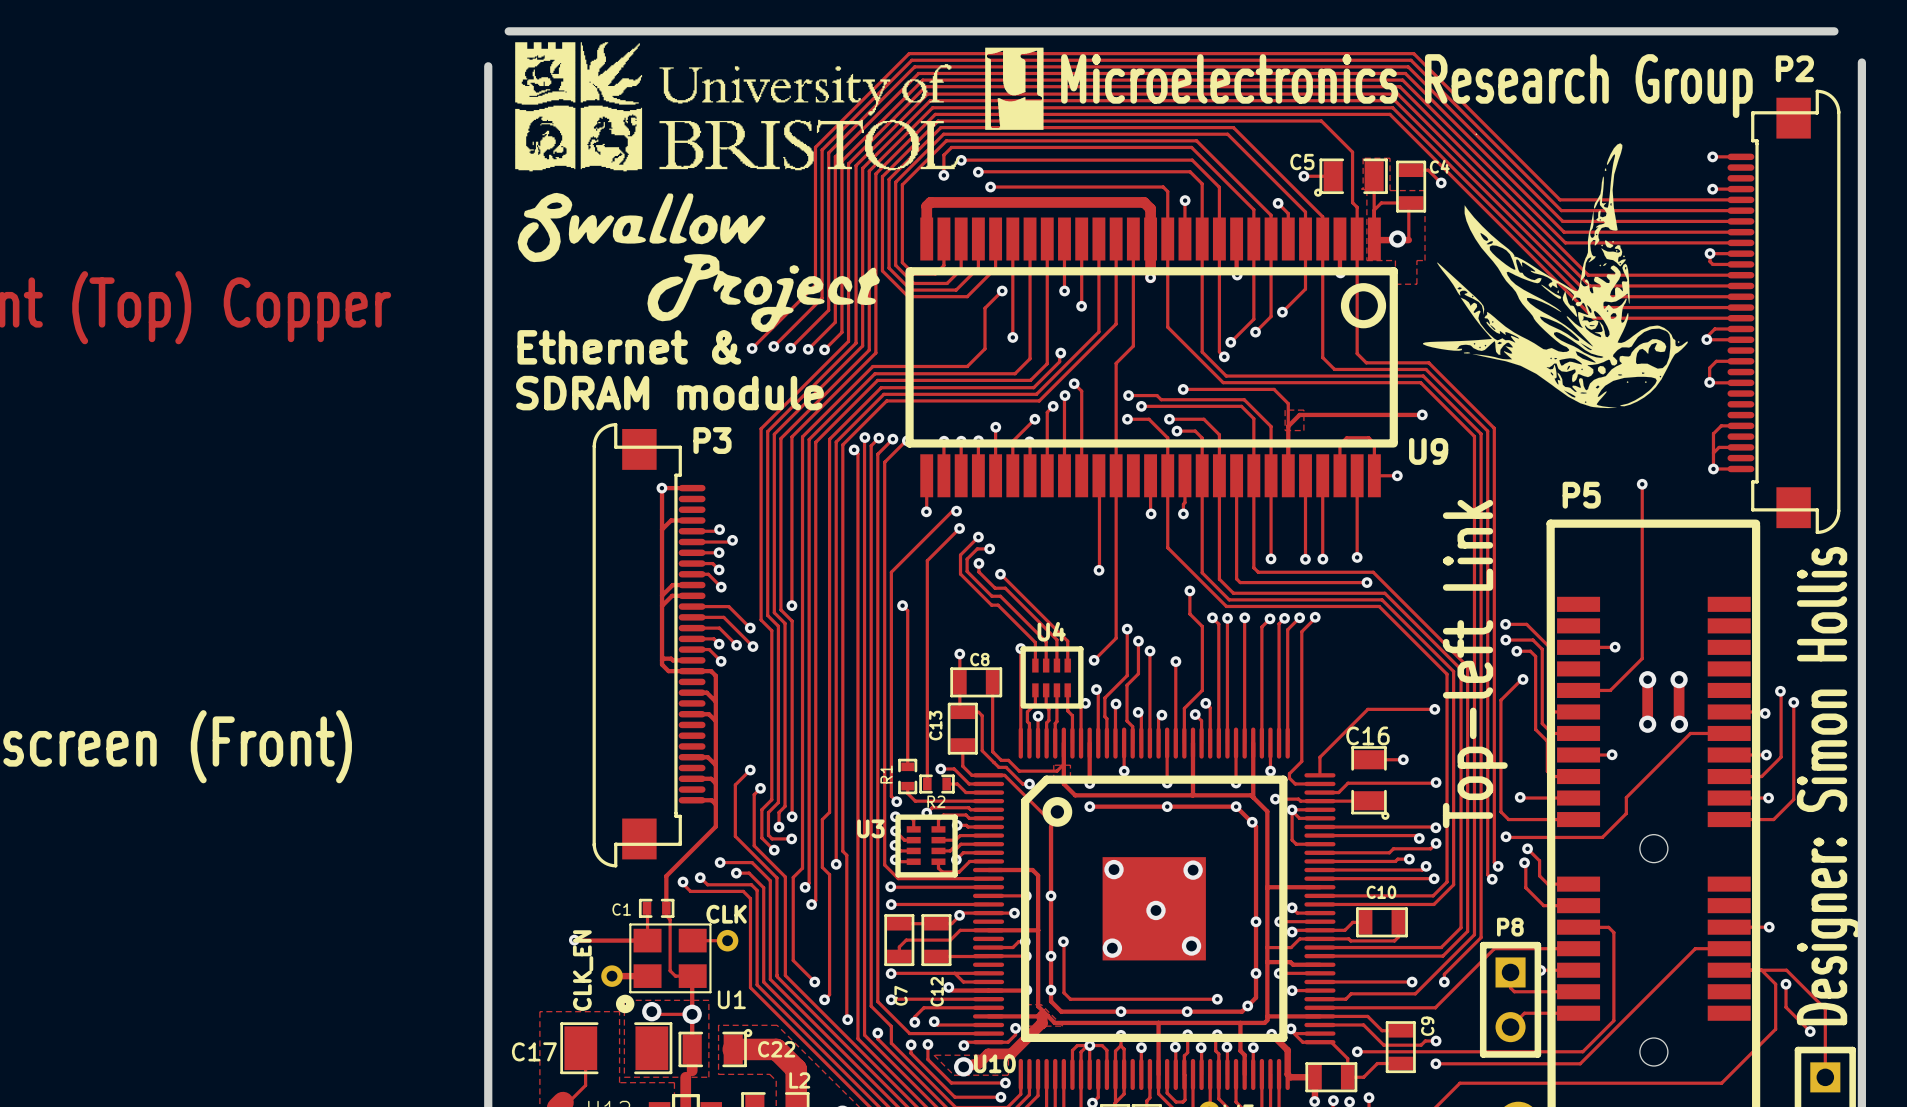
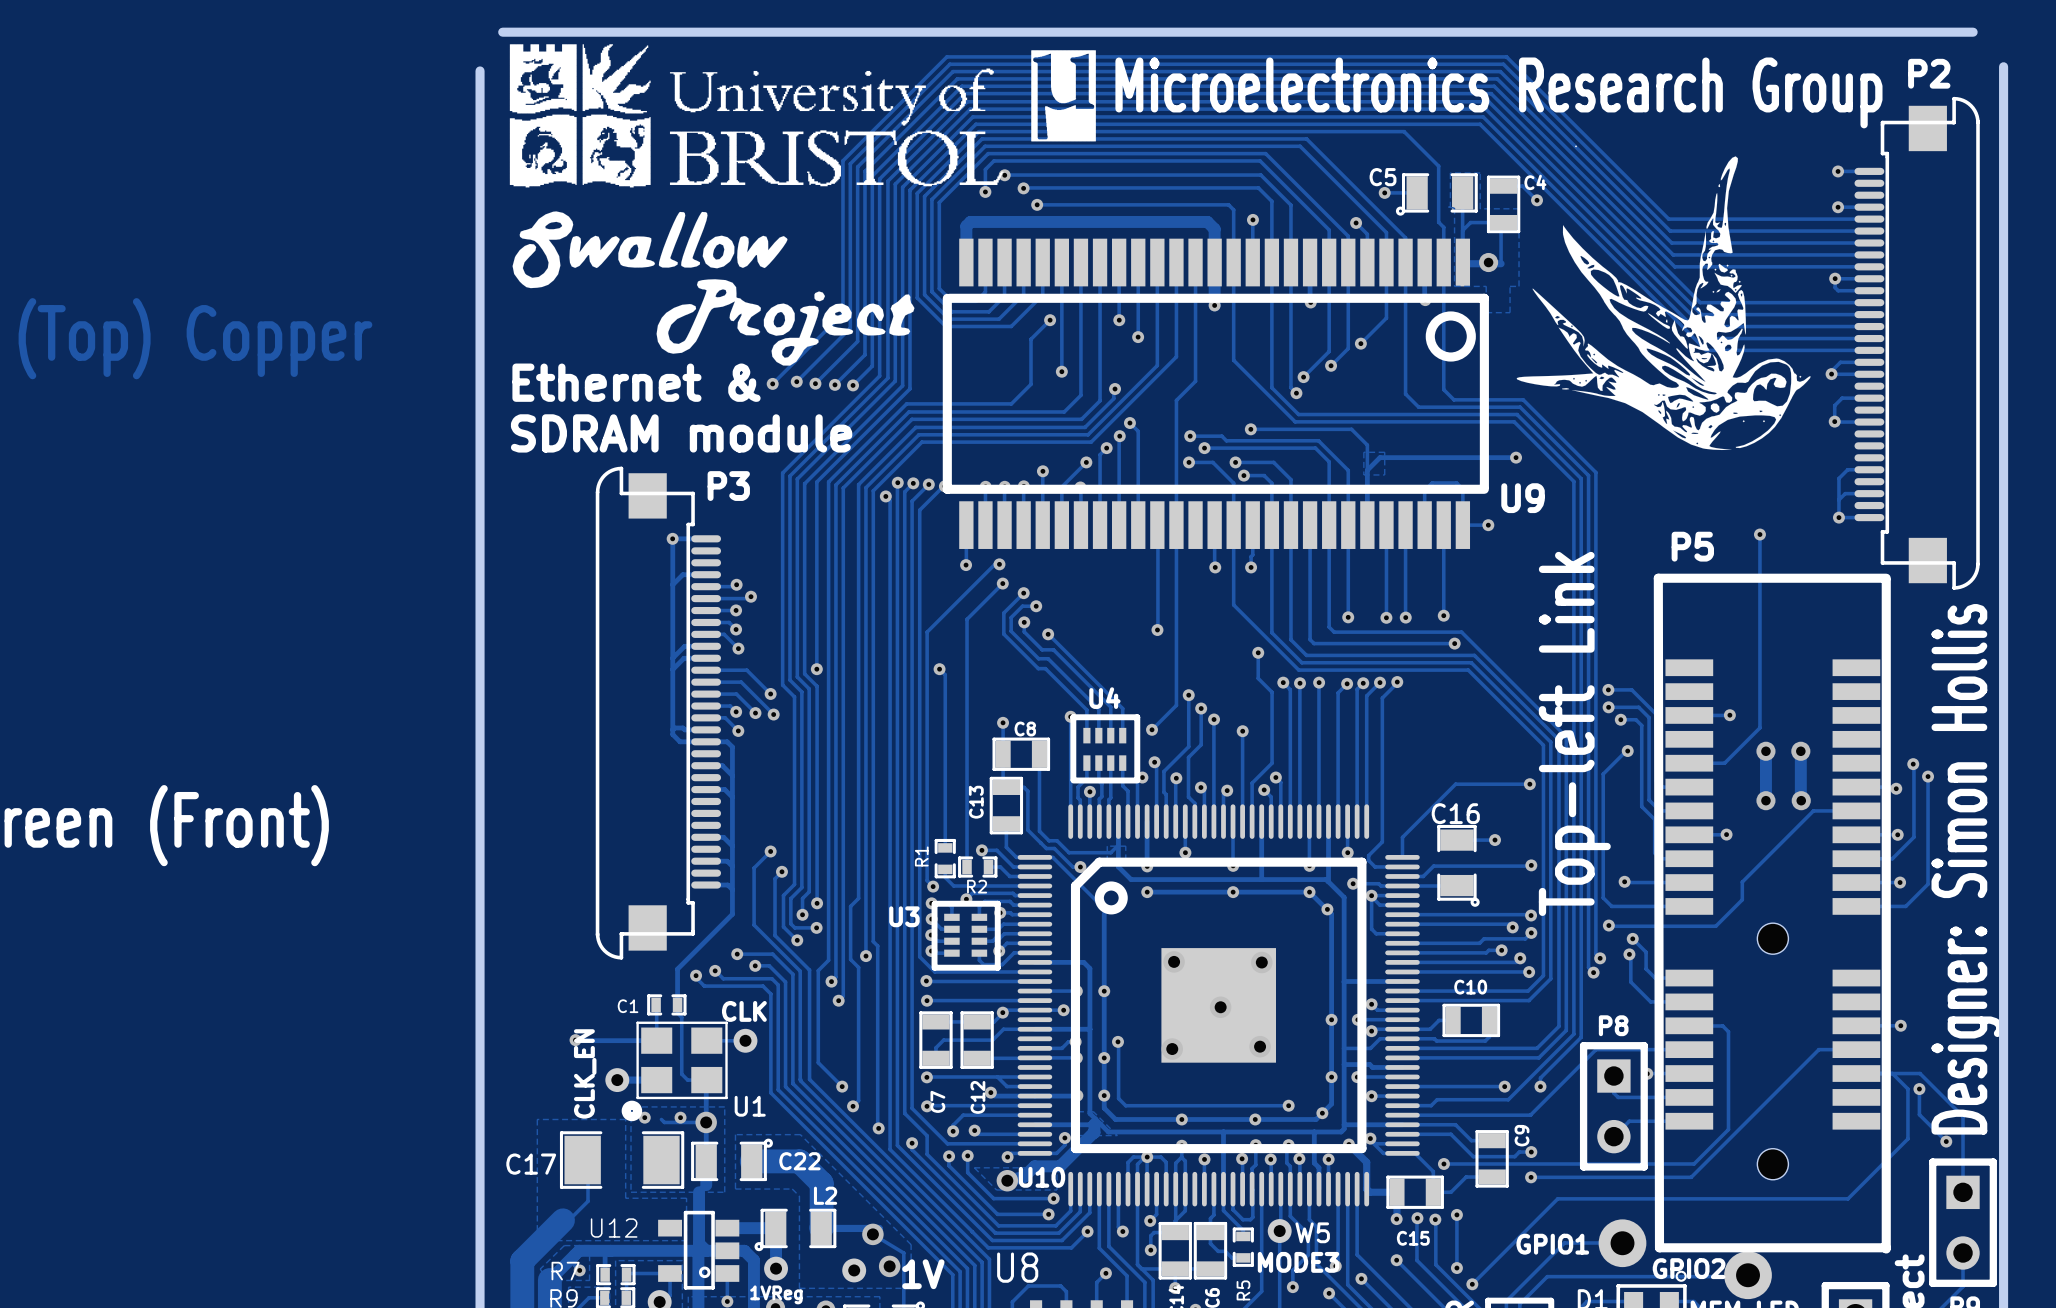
via size: [642, 1001, 662, 1022] -> [638, 1111, 651, 1124]
via: none -> (680, 1117)

